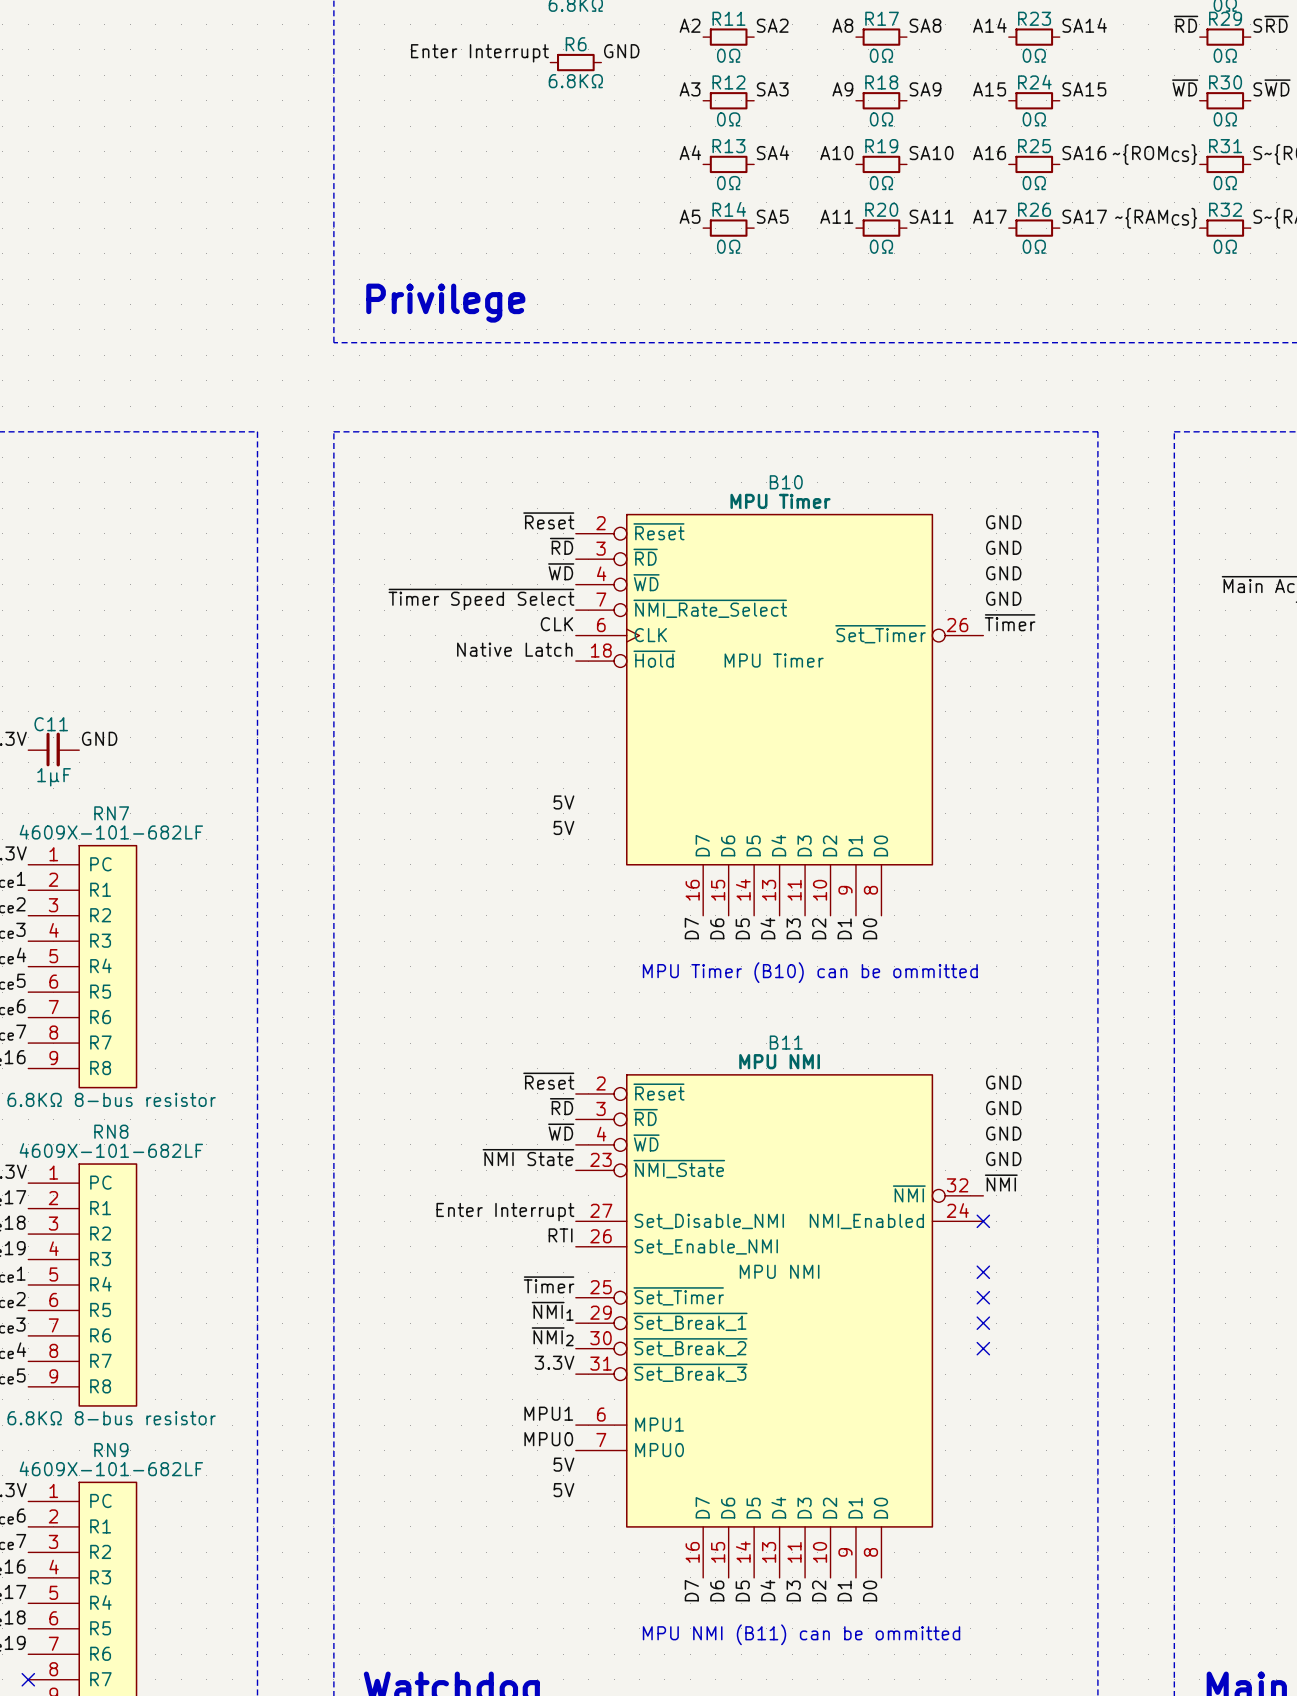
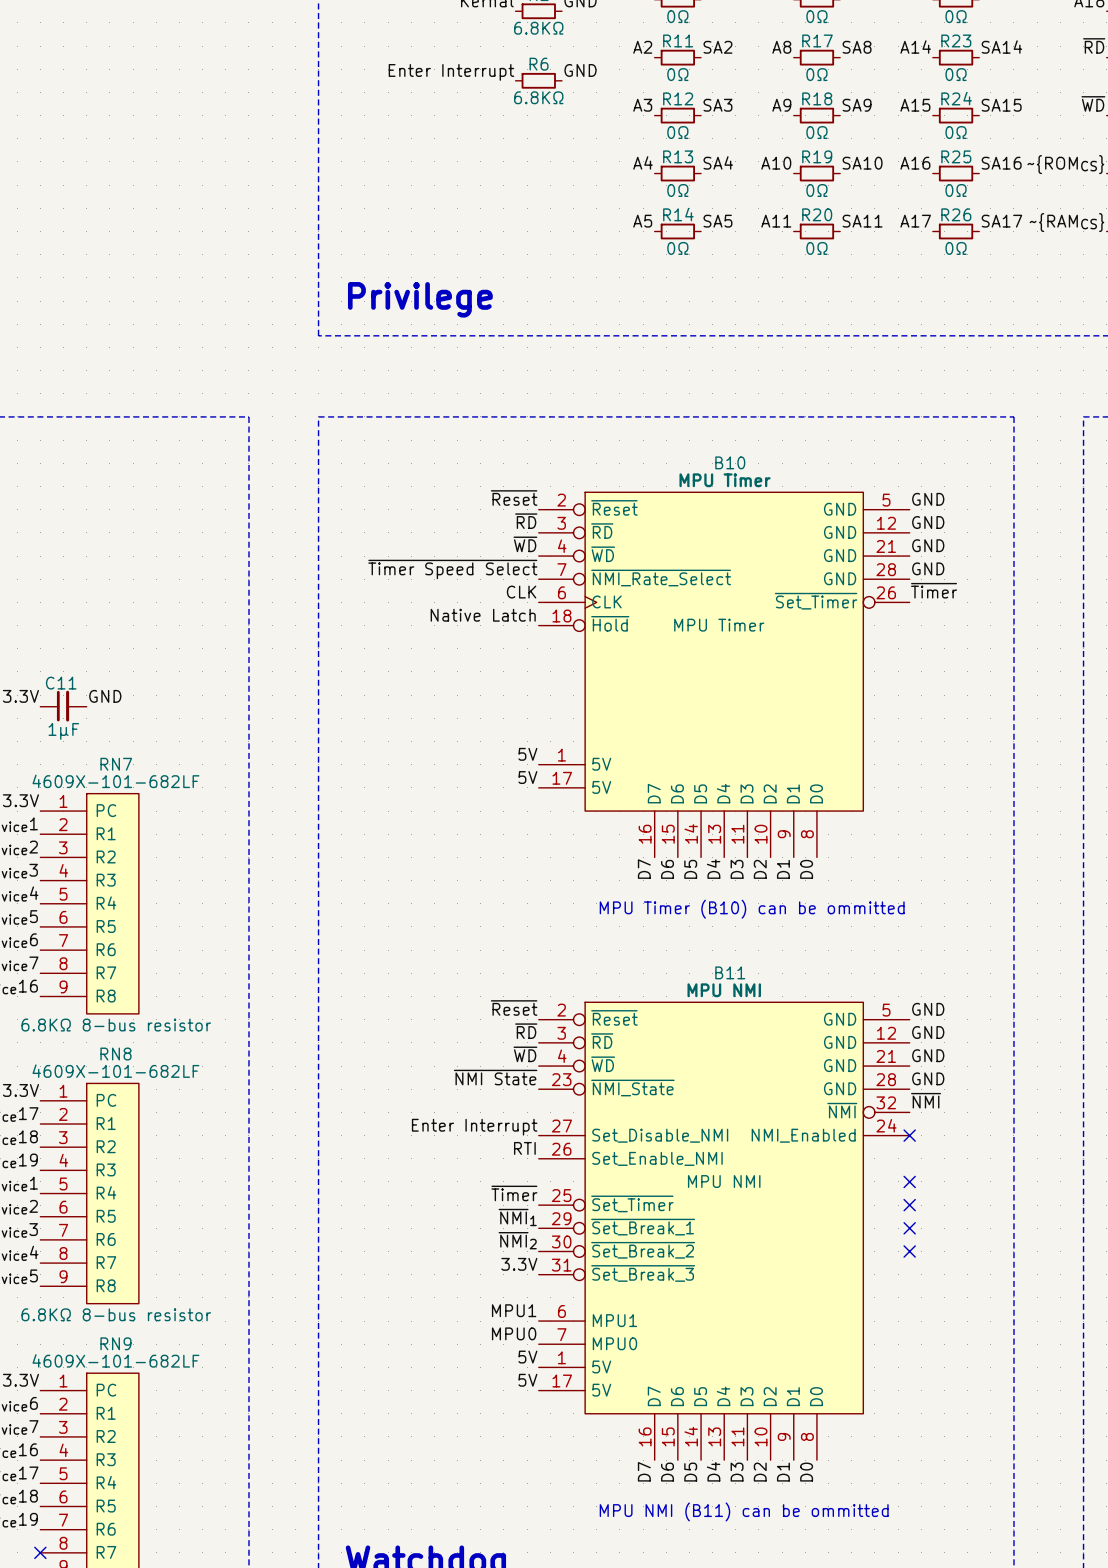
B10 symbol: [575, 513, 984, 916] -> [538, 491, 910, 858]
B11 symbol: [575, 1074, 984, 1578] -> [538, 1001, 910, 1461]

